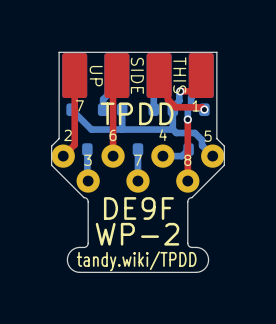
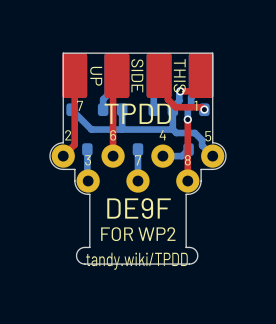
board edge: (59, 52) (216, 52) (216, 138) (224, 146) (224, 165) (187, 201) (187, 244) (190, 247) (200, 248) (206, 253) (208, 263) (202, 270) (196, 272) (79, 272) (73, 270) (69, 266) (67, 259) (69, 252) (76, 247) (85, 247) (88, 244) (88, 201) (51, 165) (51, 146) (59, 138) (59, 52) -> (63, 53) (63, 142) (52, 148) (50, 157) (52, 164) (58, 168) (74, 169) (76, 187) (81, 192) (89, 194) (89, 247) (78, 249) (76, 254) (77, 259) (84, 264) (193, 262) (197, 258) (197, 252) (192, 248) (186, 247) (186, 194) (194, 192) (199, 187) (201, 169) (217, 168) (223, 164) (225, 157) (223, 148) (212, 142) (212, 53) (63, 53)
text: WP-2 (137, 234) -> FOR WP2 (138, 234)

